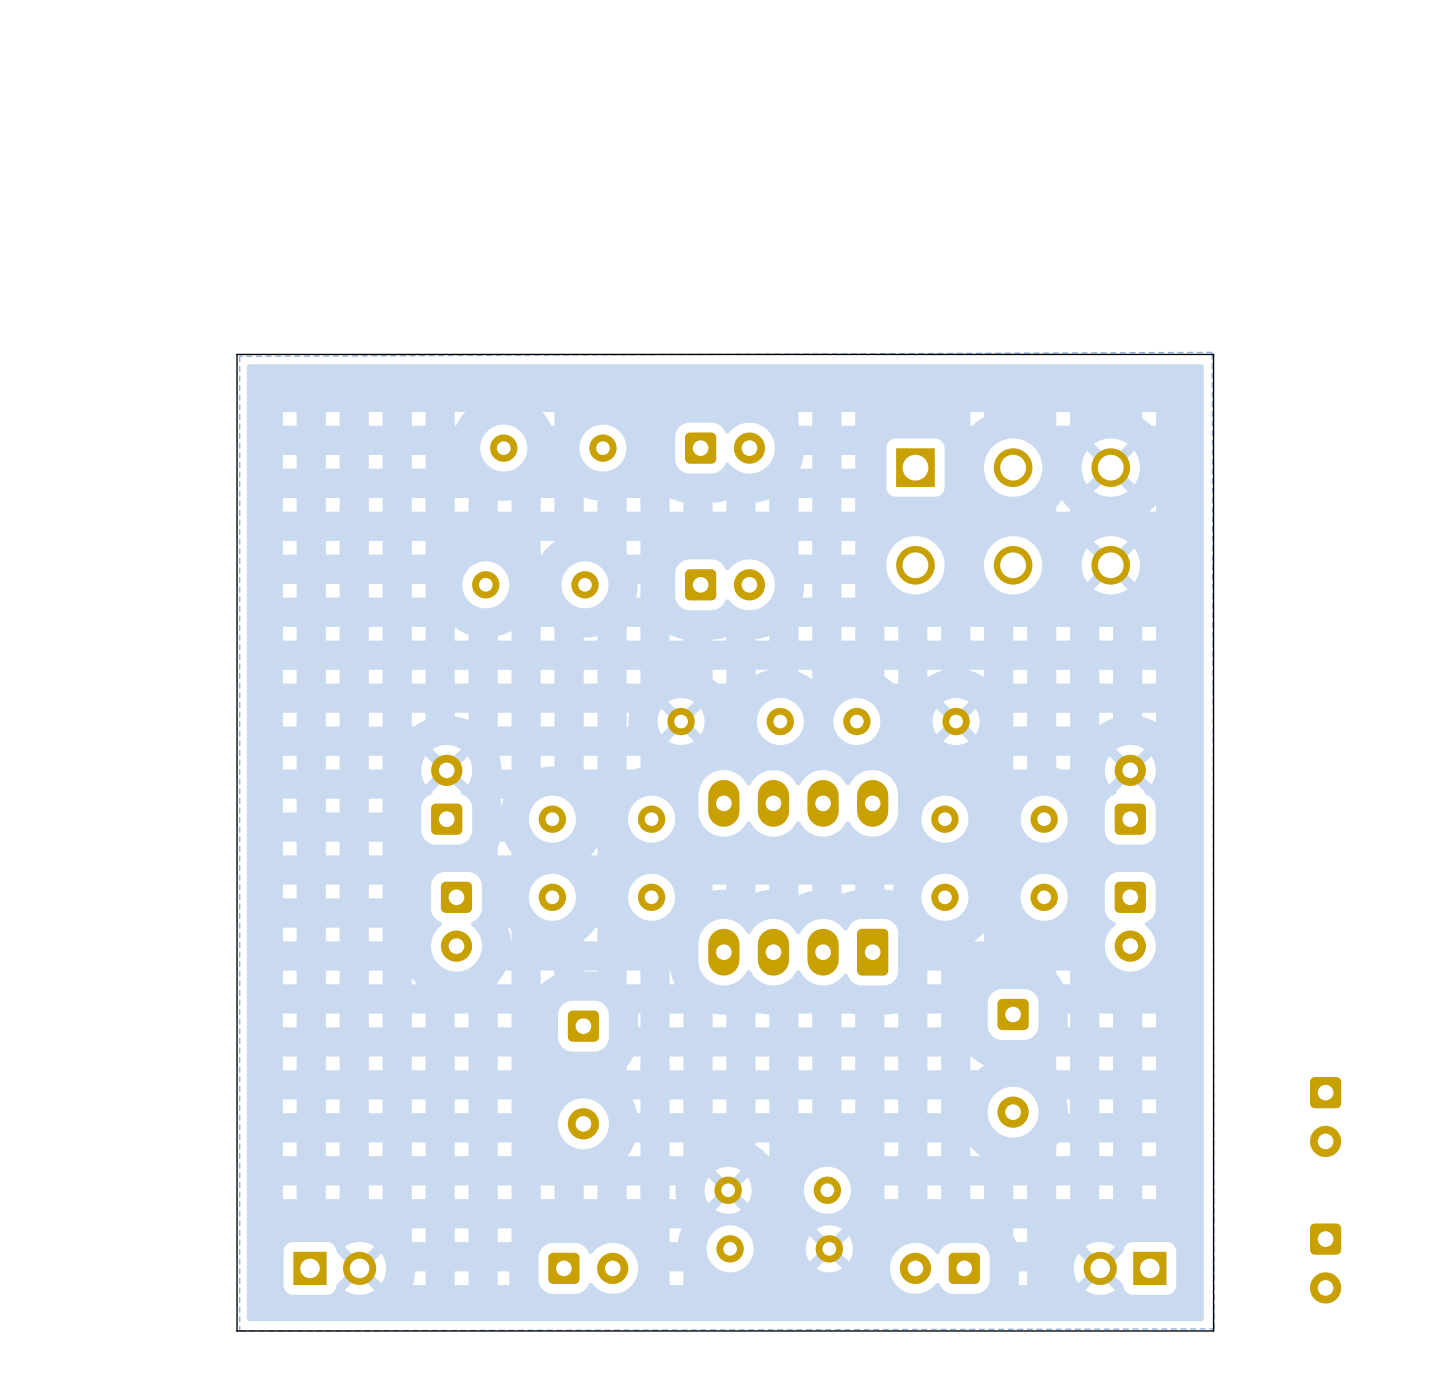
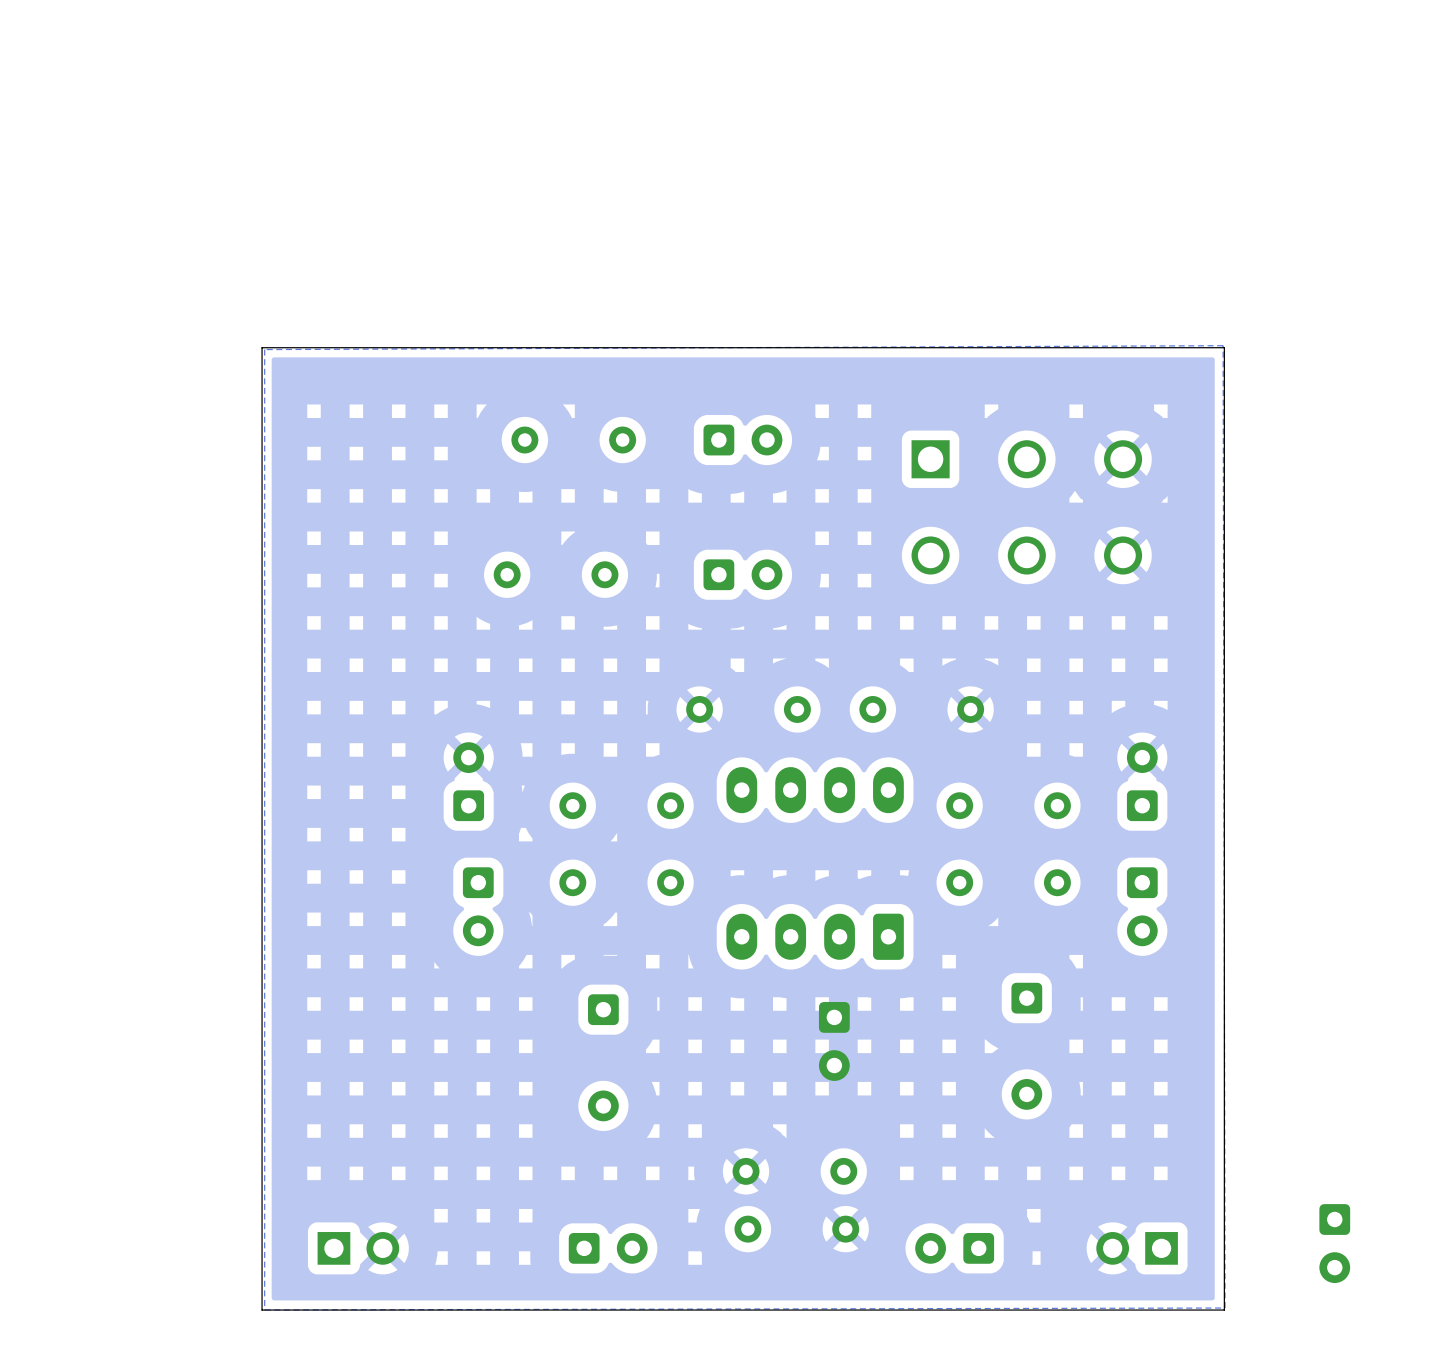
part: none -> (834, 1041)
part: (1325, 1117) -> none

